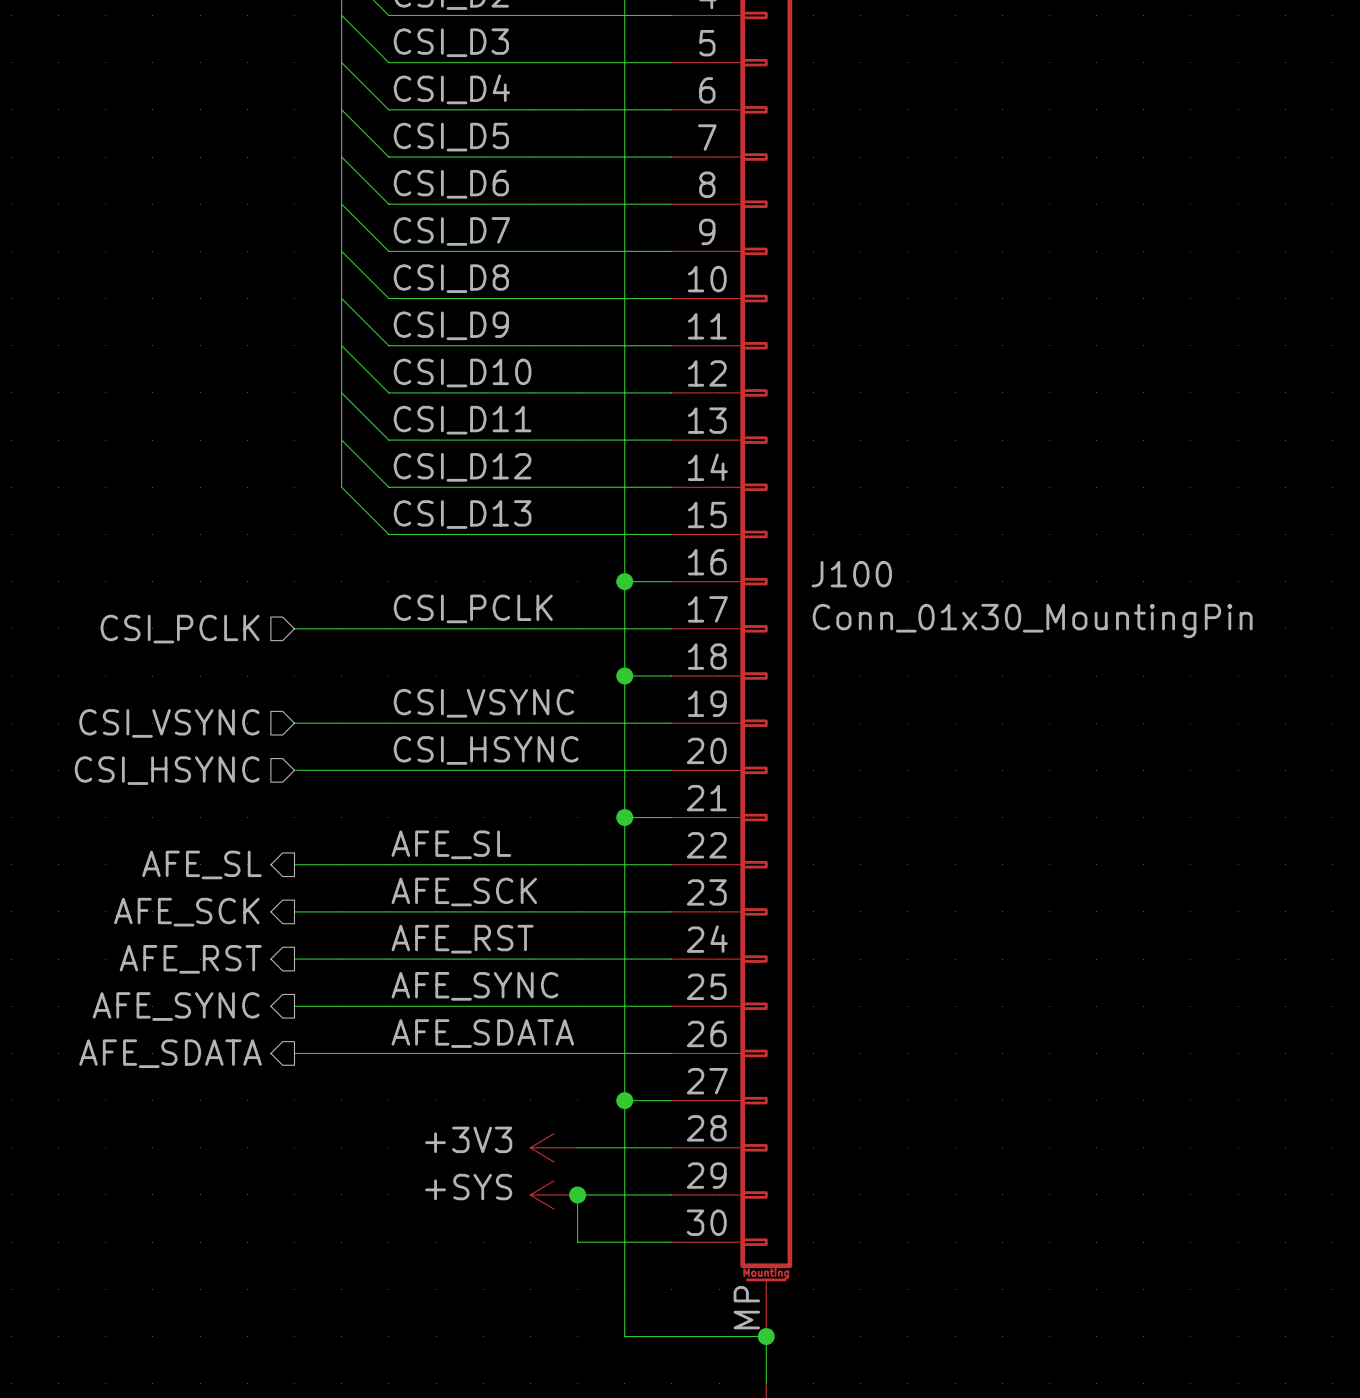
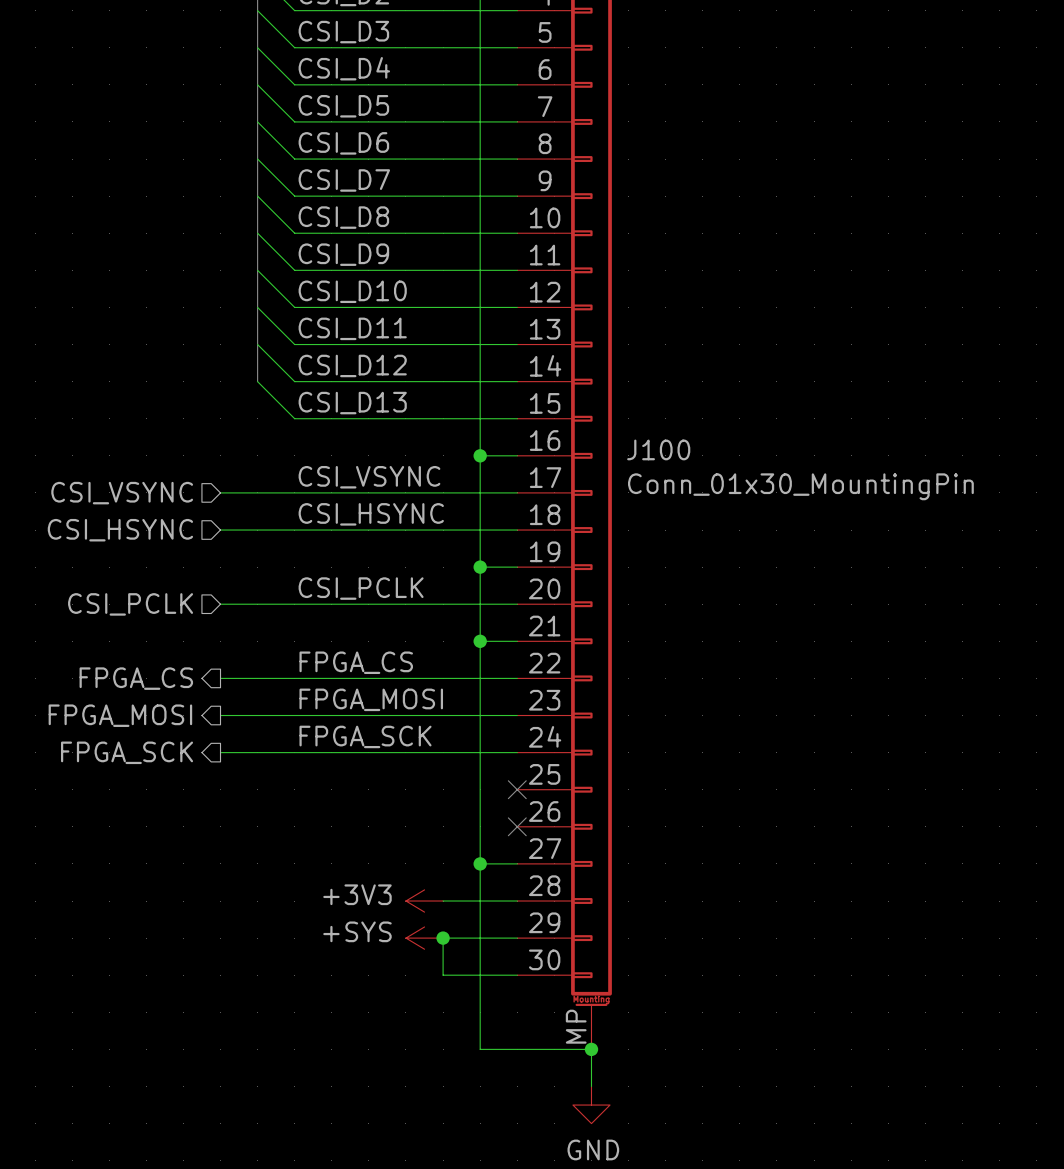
label: CSI_PCLK (473, 608) -> CSI_VSYNC (369, 477)
hierarchical label: CSI_PCLK (180, 629) -> CSI_VSYNC (122, 493)
junction position: (624, 676) -> (480, 567)
label: CSI_VSYNC (483, 703) -> CSI_HSYNC (371, 514)
hierarchical label: CSI_VSYNC (169, 723) -> CSI_HSYNC (120, 530)
wire: (294, 723) (624, 723) -> (220, 530) (480, 530)
label: CSI_HSYNC (486, 750) -> CSI_PCLK (361, 588)
hierarchical label: CSI_HSYNC (167, 770) -> CSI_PCLK (130, 604)
label: AFE_SL (451, 844) -> FPGA_CS (356, 662)
hierarchical label: AFE_SL (201, 864) -> FPGA_CS (136, 678)
label: AFE_SCK (464, 891) -> FPGA_MOSI (371, 699)
hierarchical label: AFE_SCK (186, 912) -> FPGA_MOSI (120, 715)
label: AFE_RST (462, 939) -> FPGA_SCK (365, 736)
hierarchical label: AFE_RST (190, 959) -> FPGA_SCK (127, 752)
label: AFE_SYNC (474, 986) -> none
hierarchical label: AFE_SYNC (176, 1006) -> none
wire: (294, 1006) (671, 1006) -> none
no-connect mark: none -> (517, 789)
label: AFE_SDATA (482, 1033) -> none
hierarchical label: AFE_SDATA (170, 1053) -> none
wire: (294, 1053) (671, 1053) -> none
no-connect mark: none -> (517, 826)

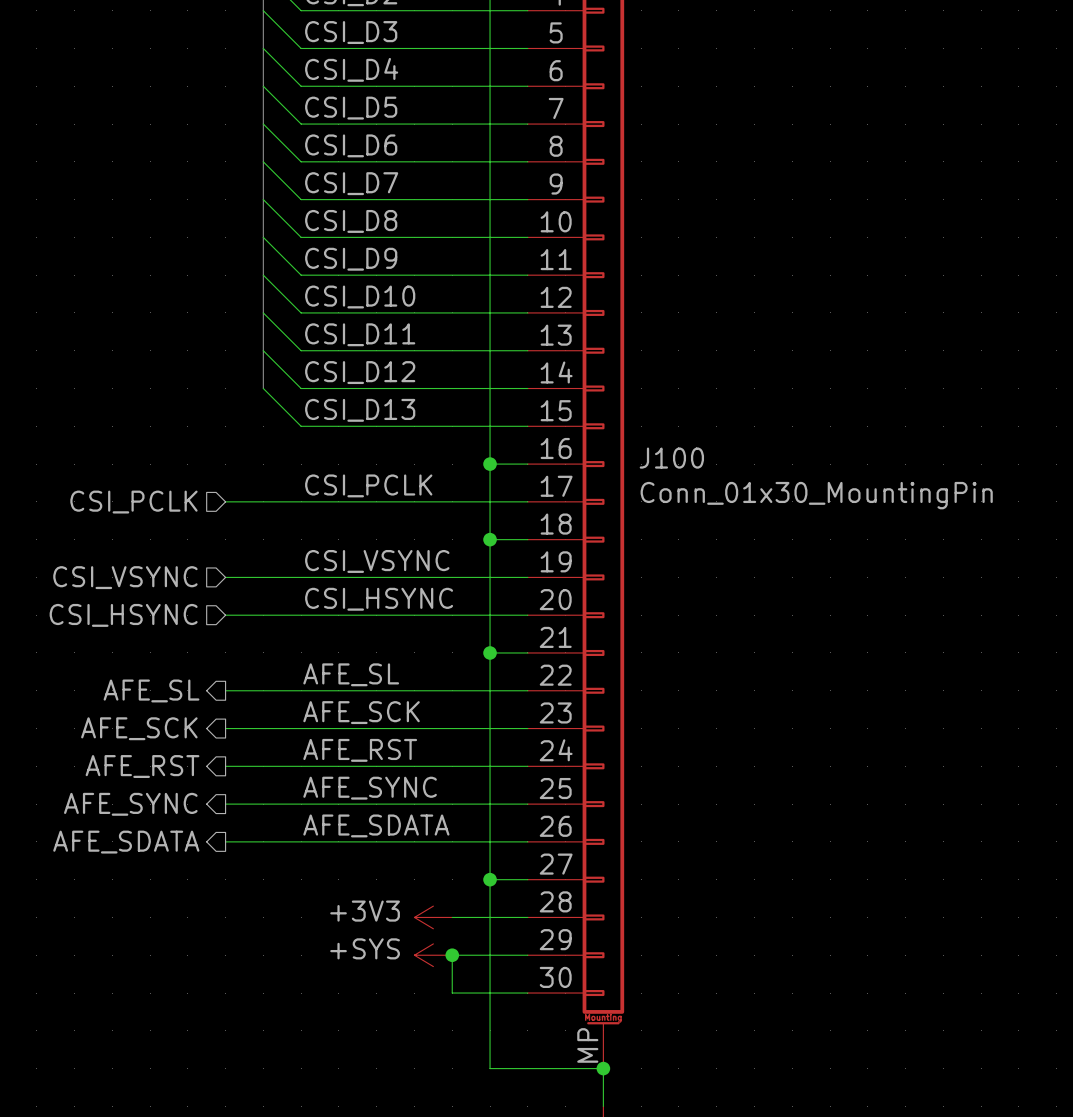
label: CSI_VSYNC (369, 477) -> CSI_PCLK (368, 485)
hierarchical label: CSI_VSYNC (122, 493) -> CSI_PCLK (133, 502)
label: CSI_HSYNC (371, 514) -> CSI_VSYNC (377, 561)
hierarchical label: CSI_HSYNC (120, 530) -> CSI_VSYNC (125, 577)
wire: (220, 530) (480, 530) -> (225, 577) (490, 577)
junction position: (480, 567) -> (490, 539)
label: CSI_PCLK (361, 588) -> CSI_HSYNC (379, 599)
hierarchical label: CSI_PCLK (130, 604) -> CSI_HSYNC (123, 615)
label: FPGA_CS (356, 662) -> AFE_SL (351, 674)
hierarchical label: FPGA_CS (136, 678) -> AFE_SL (151, 690)
label: FPGA_MOSI (371, 699) -> AFE_SCK (361, 712)
hierarchical label: FPGA_MOSI (120, 715) -> AFE_SCK (139, 728)
label: FPGA_SCK (365, 736) -> AFE_RST (360, 750)
hierarchical label: FPGA_SCK (127, 752) -> AFE_RST (142, 766)
label: none -> AFE_SYNC (370, 788)
hierarchical label: none -> AFE_SYNC (130, 804)
wire: none -> (225, 804) (527, 804)
no-connect mark: (517, 789) -> none
label: none -> AFE_SDATA (376, 825)
hierarchical label: none -> AFE_SDATA (126, 842)
wire: none -> (225, 841) (527, 841)
no-connect mark: (517, 826) -> none

